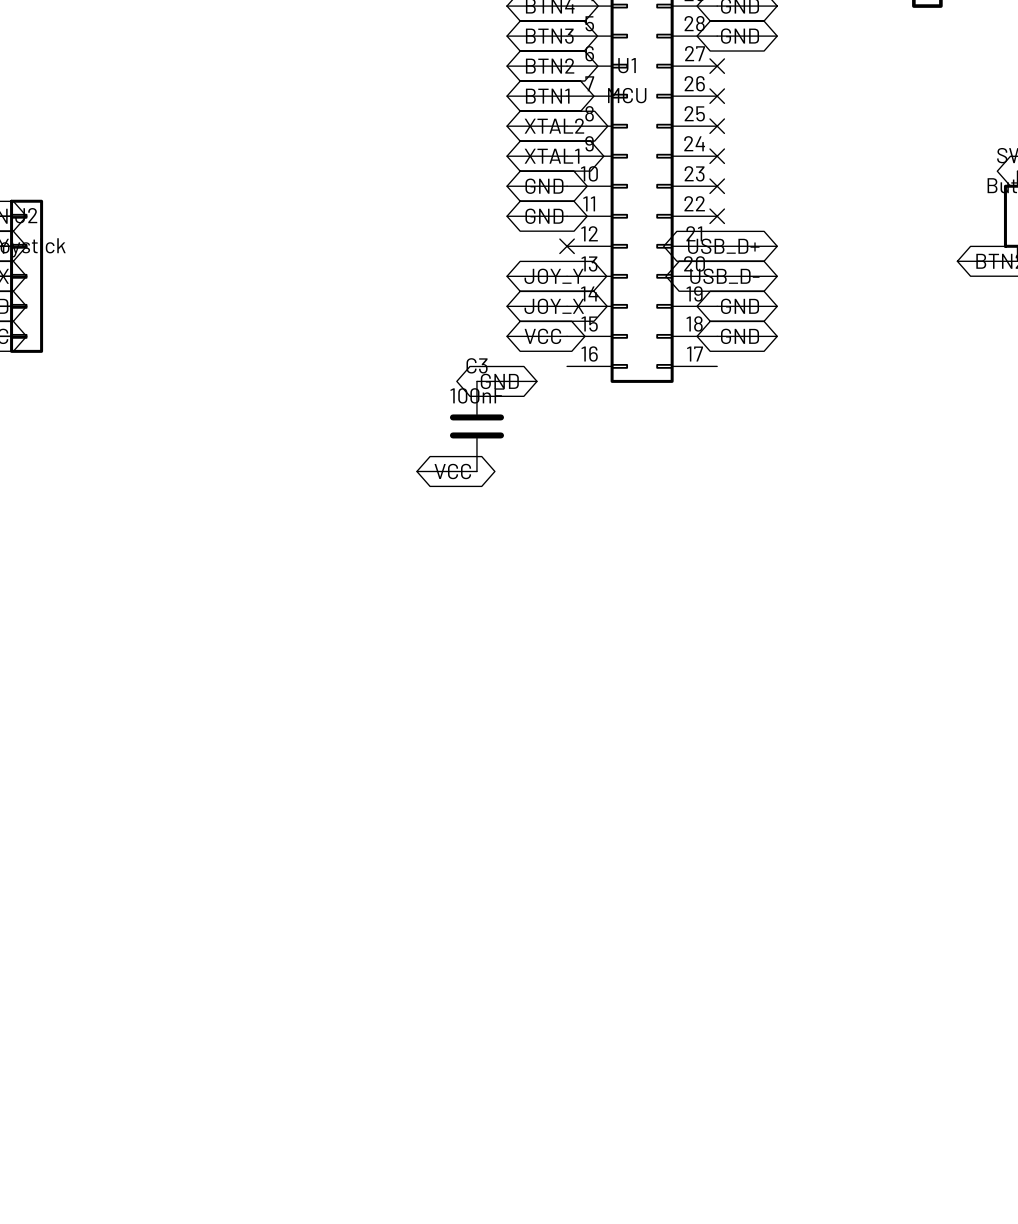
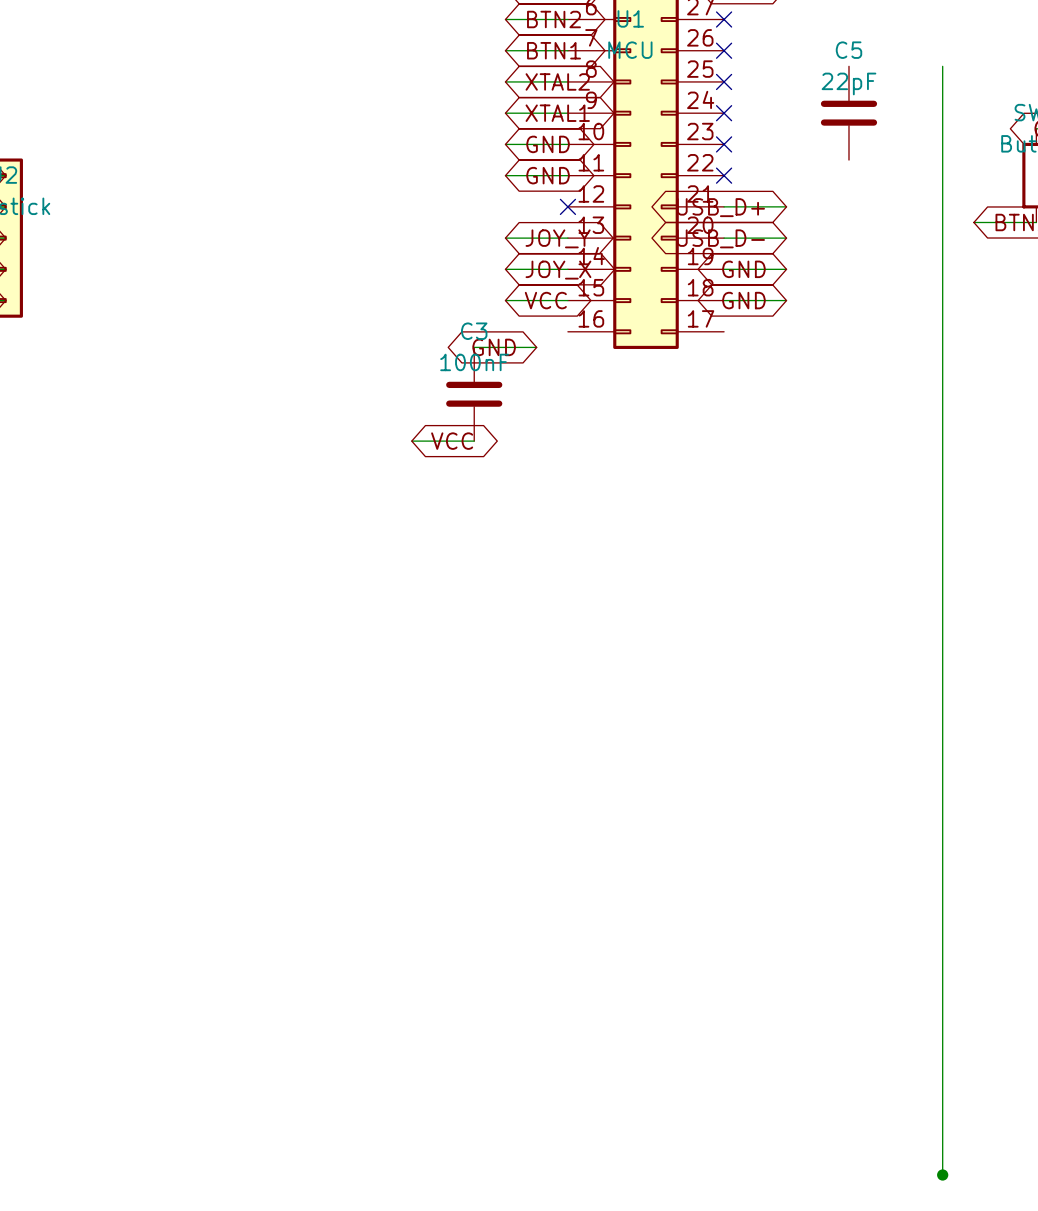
wire: none -> (942, 66) (942, 1175)
C5: none -> 22pF (848, 113)
junction: none -> (942, 1175)

